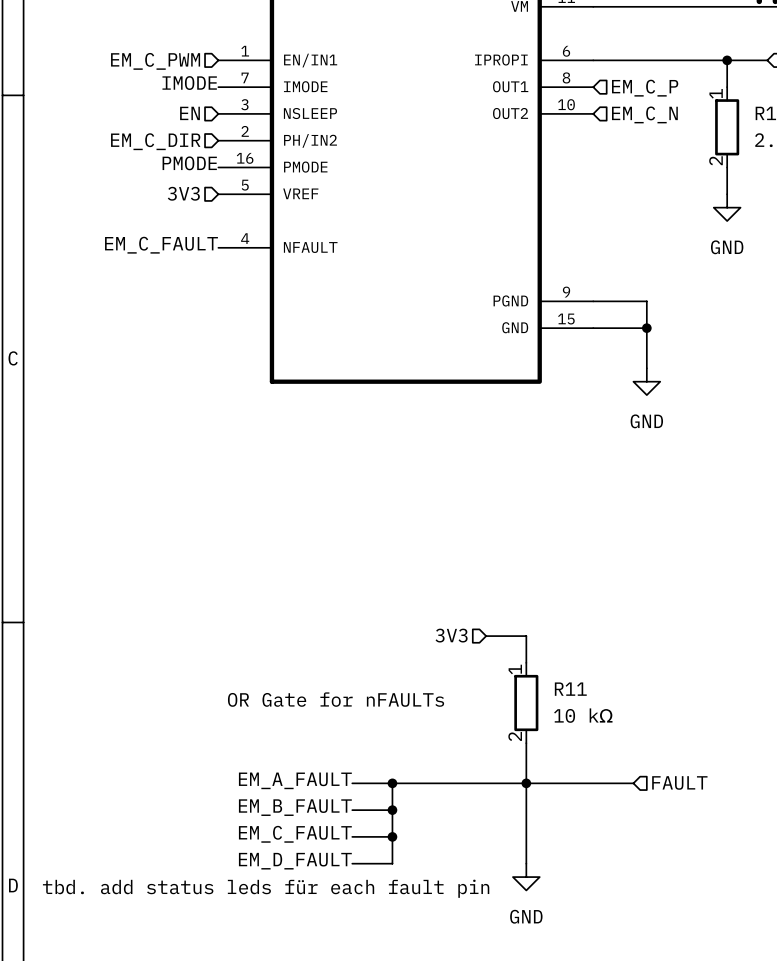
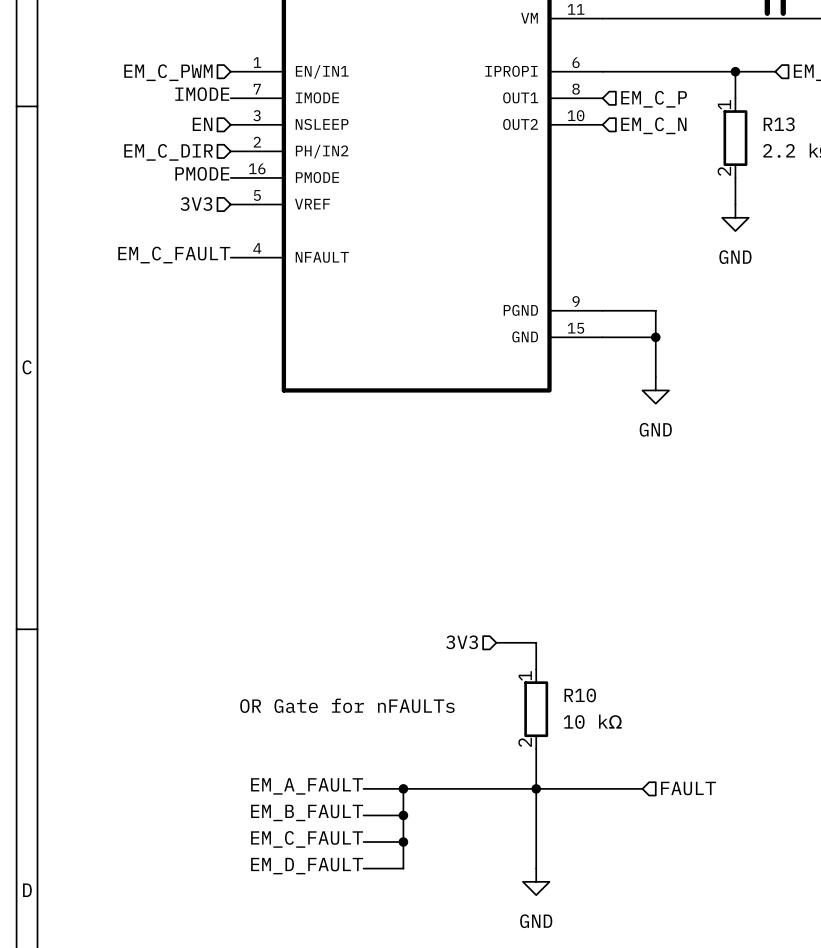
R11 name: R11 (570, 689) -> R10 (580, 695)
text: tbd. add status leds für each fault pin (266, 888) -> none

